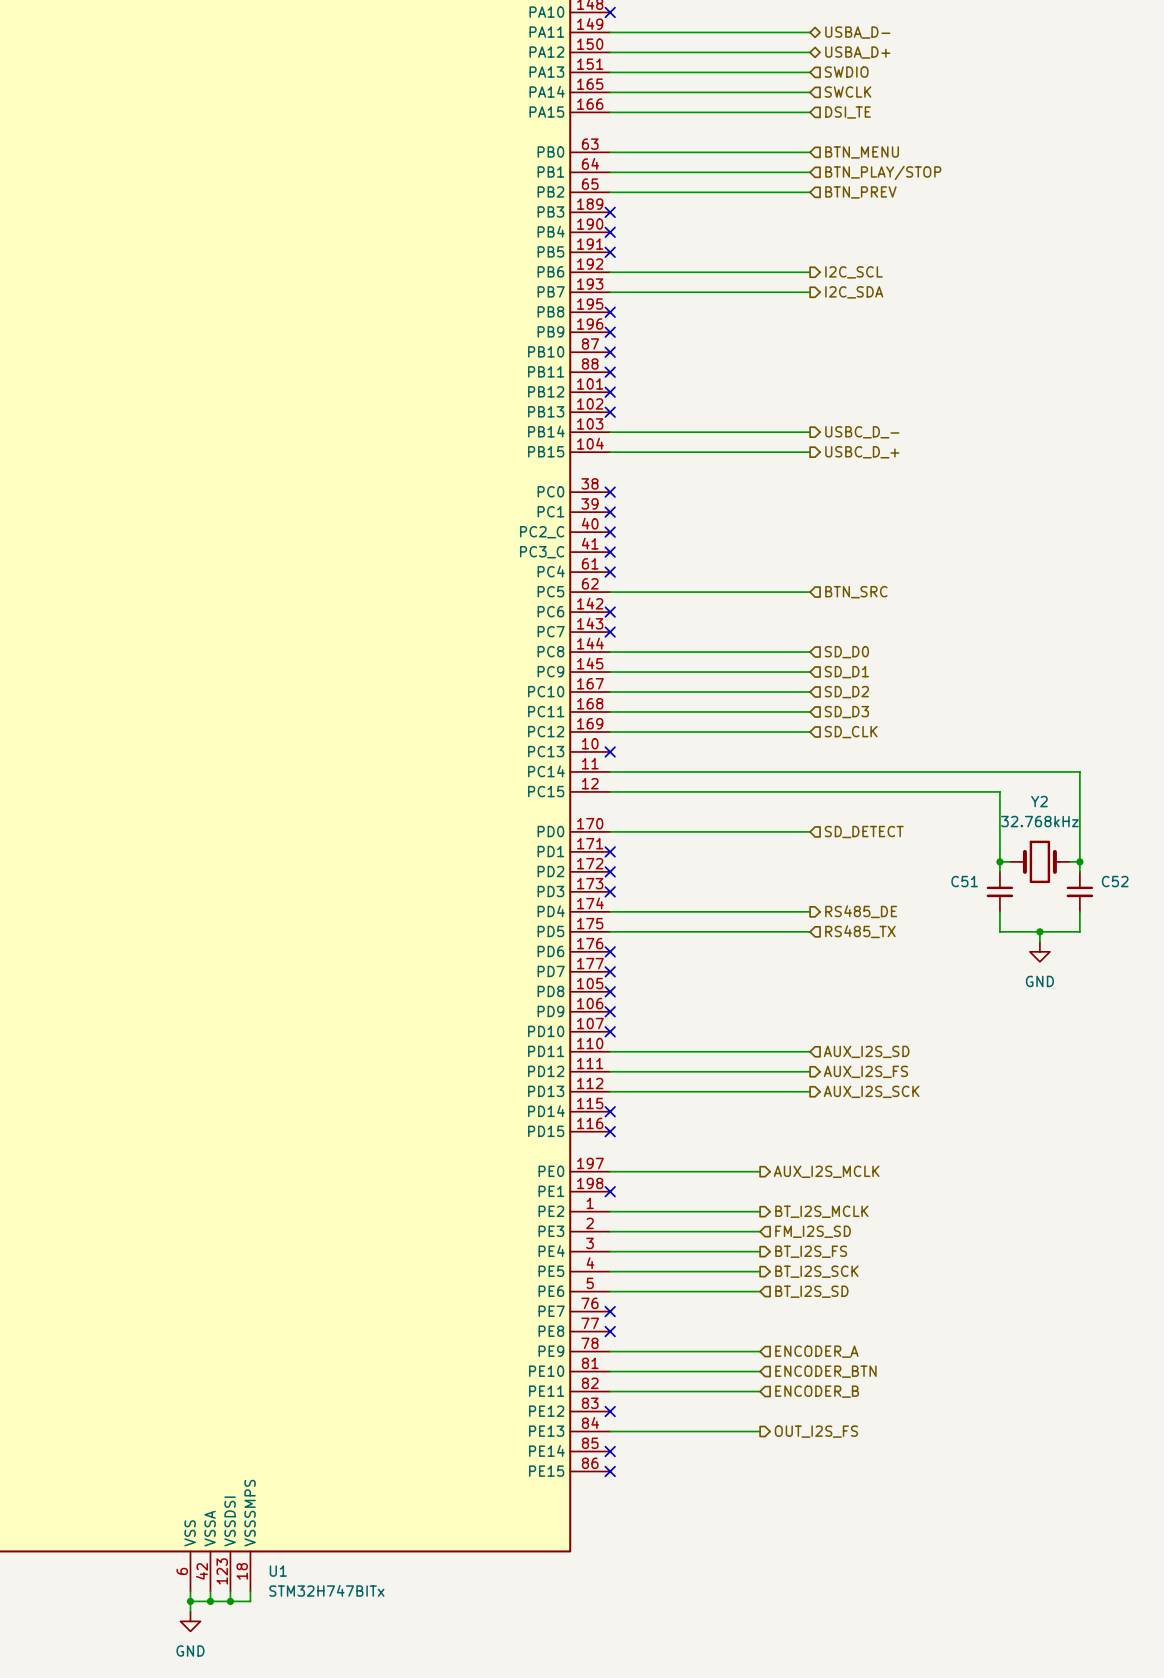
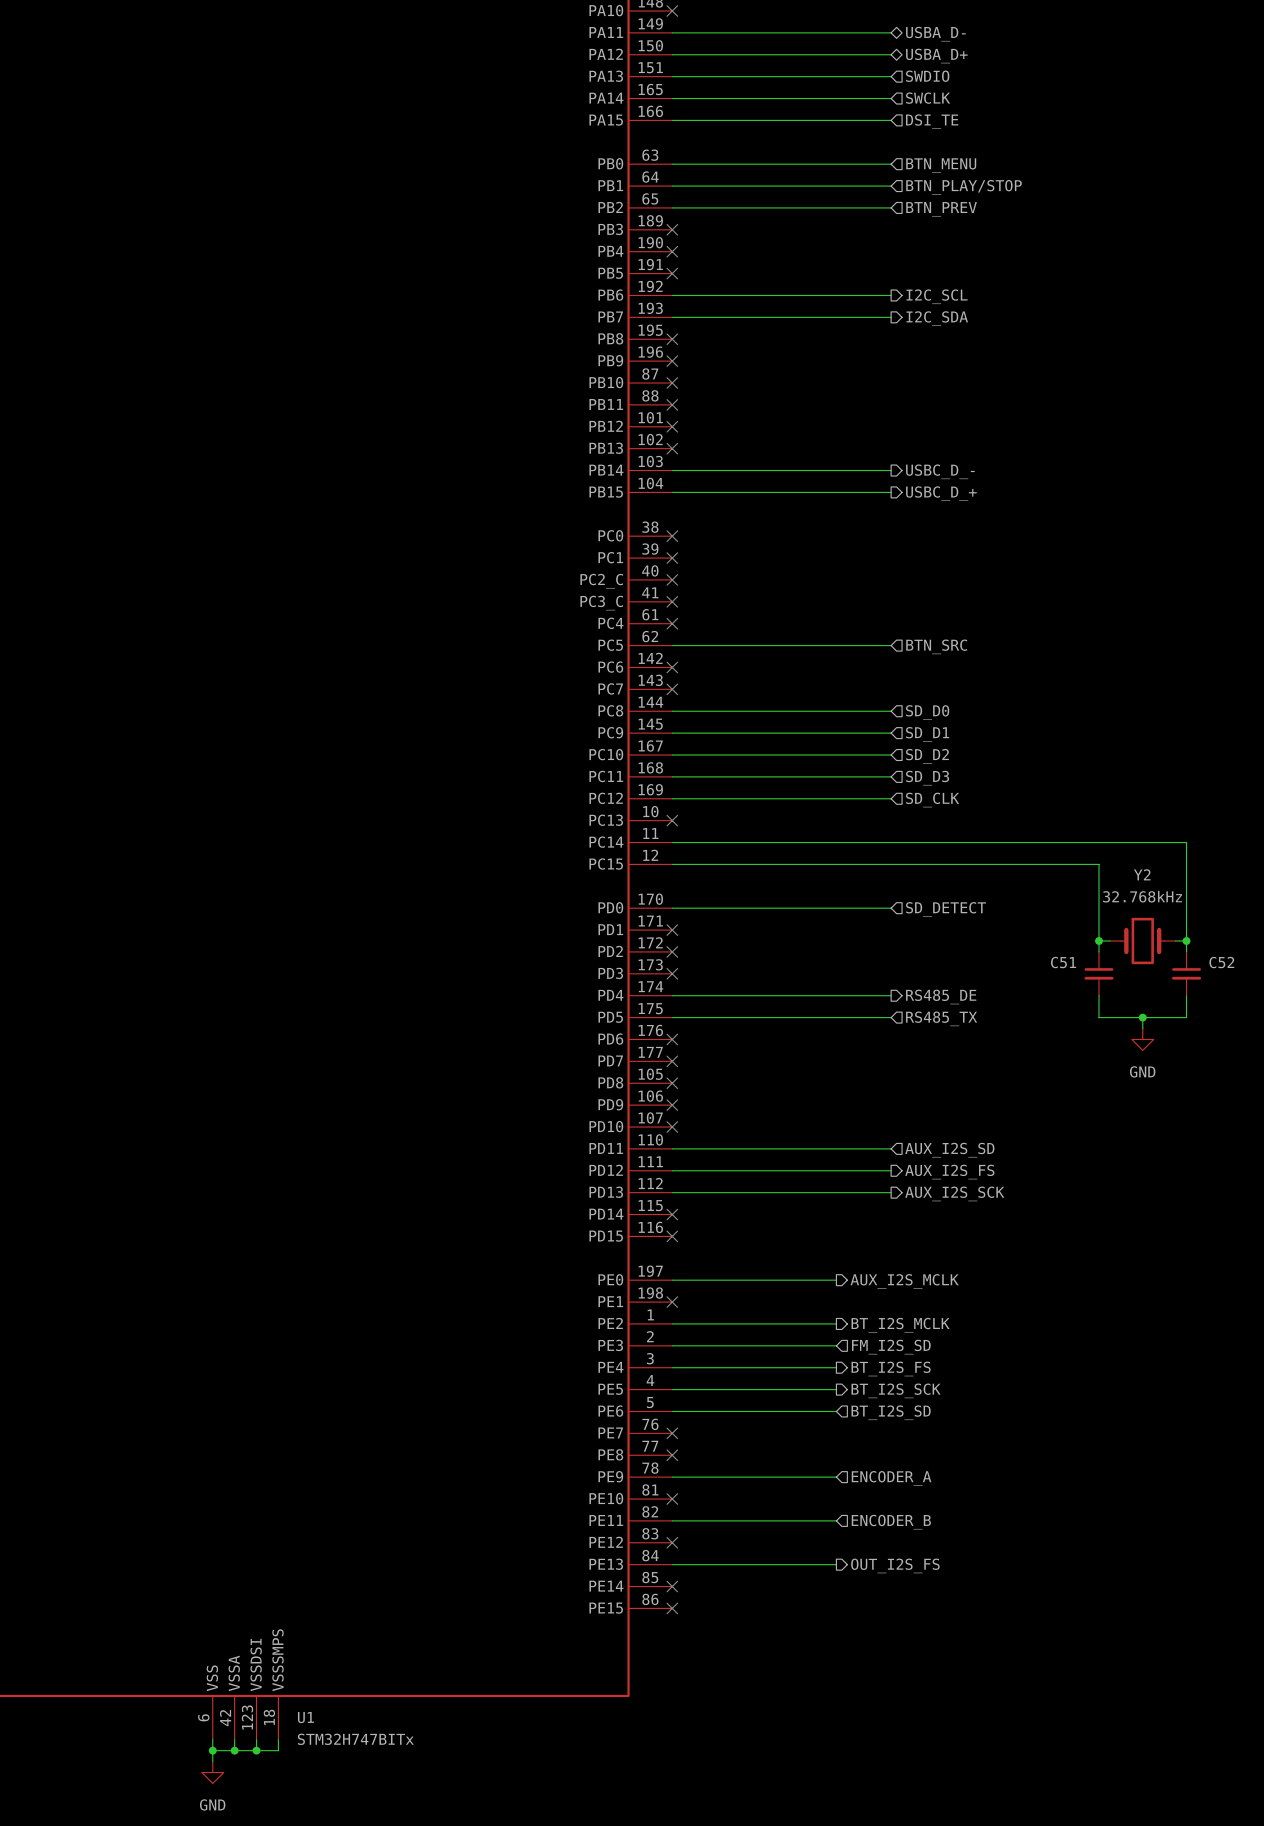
wire: (610, 1371) (760, 1371) -> none
no-connect mark: none -> (672, 1499)
hierarchical label: ENCODER_BTN (825, 1371) -> none

